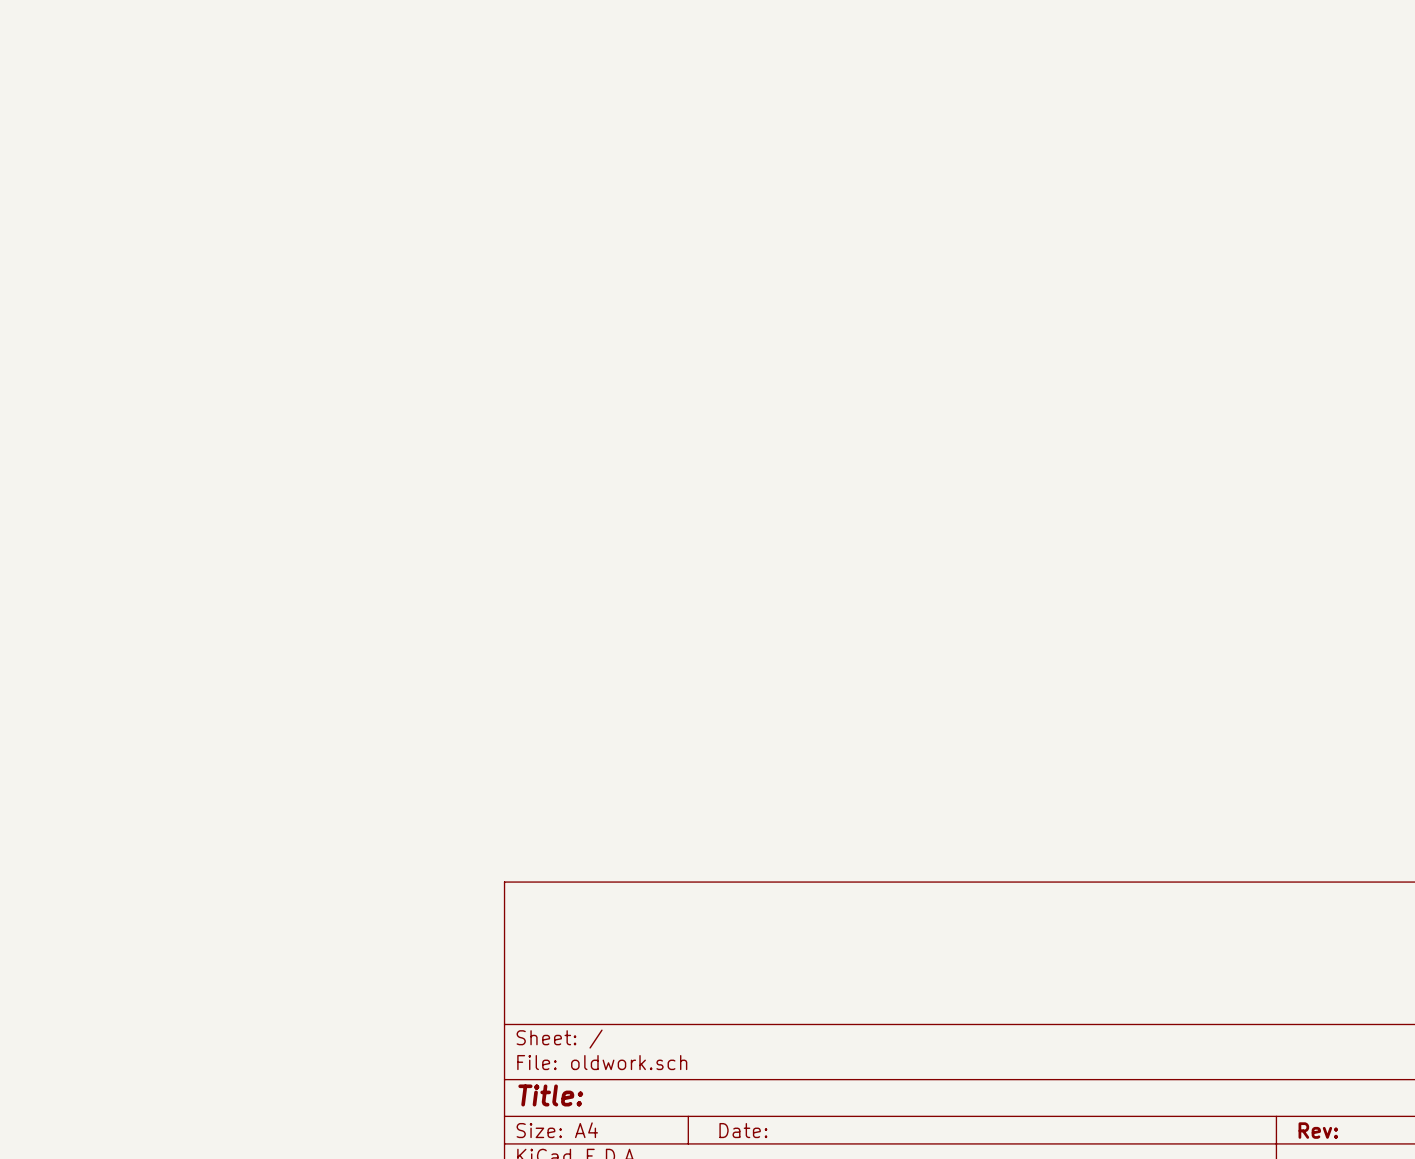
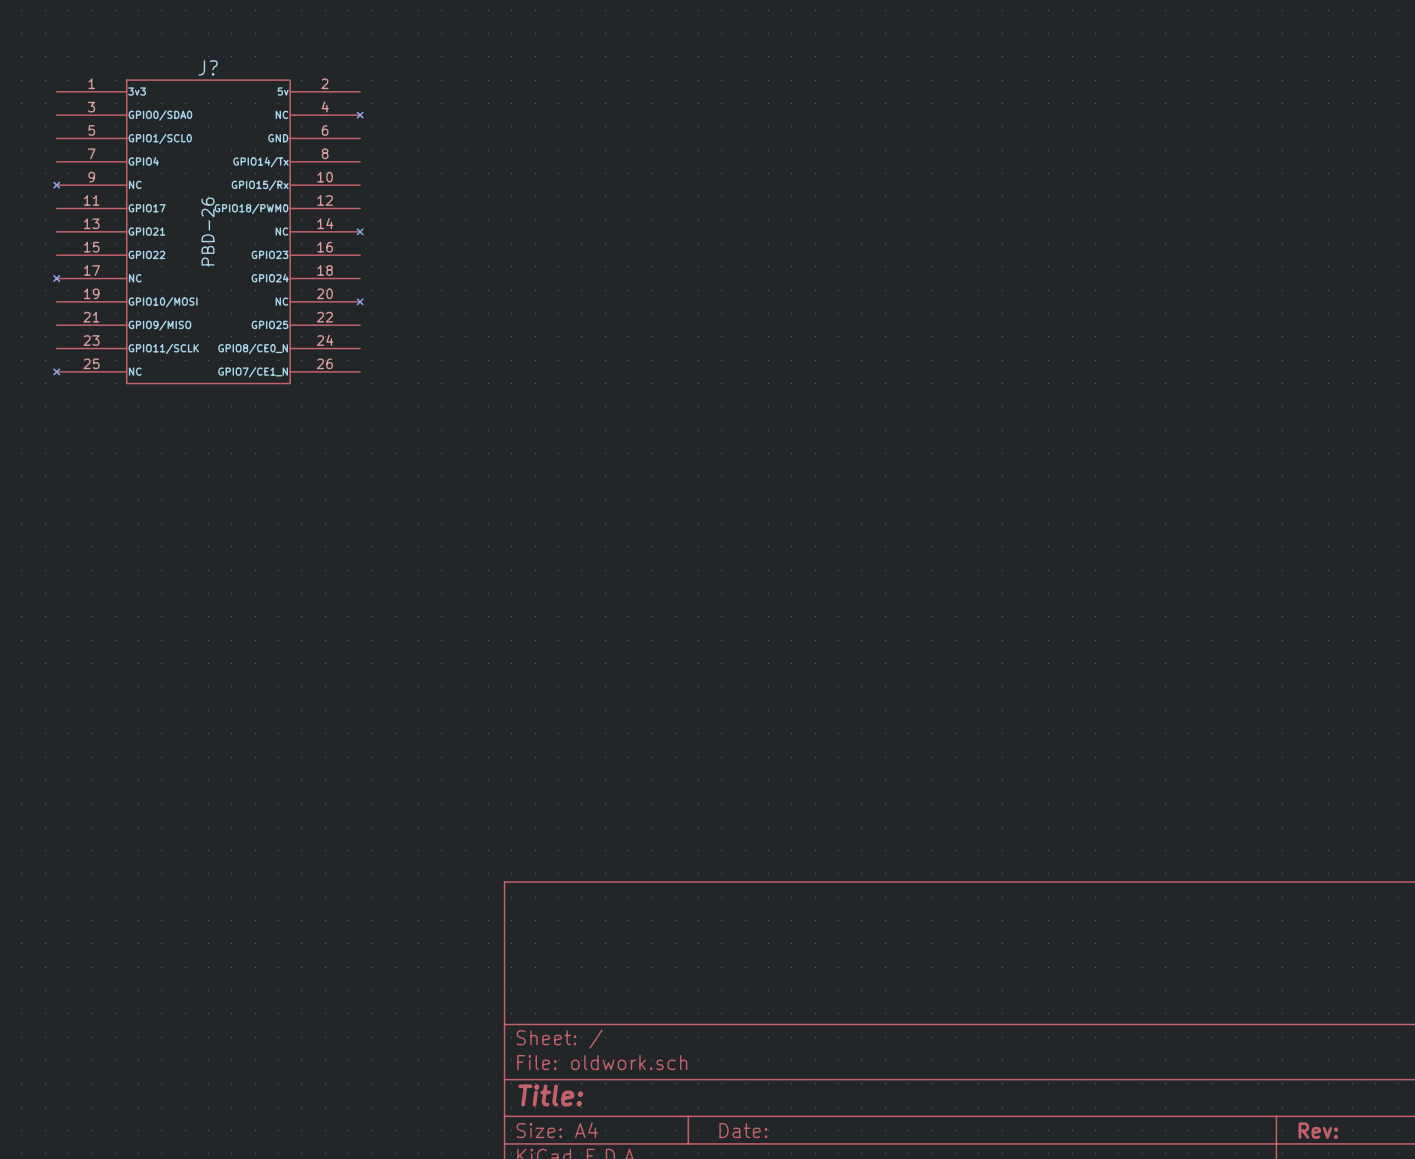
J?: none -> PBD-26 (208, 231)

